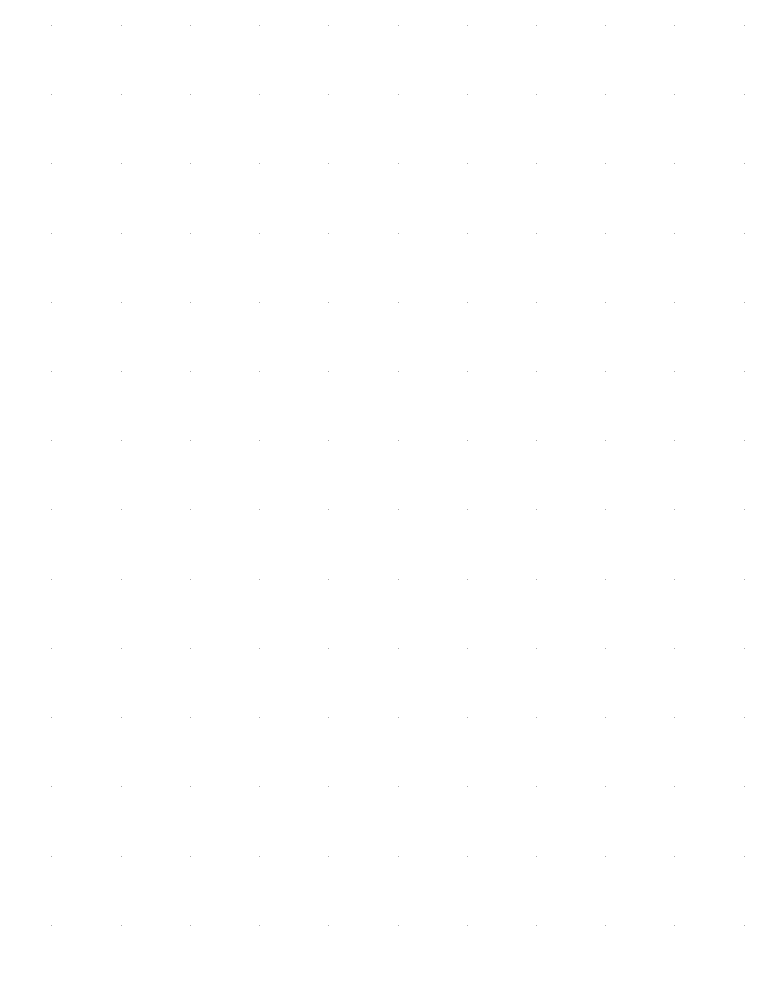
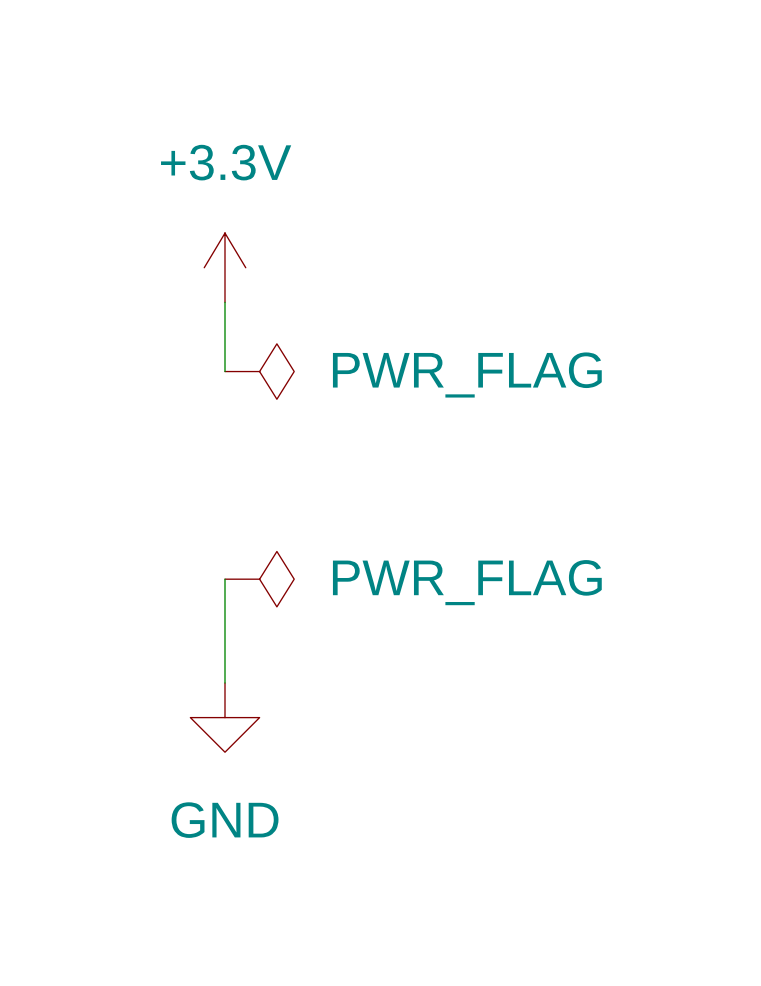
power symbol: none -> +3.3V (224, 267)
wire: none -> (224, 302) (224, 371)
power symbol: none -> PWR_FLAG (259, 371)
wire: none -> (224, 579) (224, 682)
power symbol: none -> PWR_FLAG (259, 579)
power symbol: none -> GND (224, 717)

